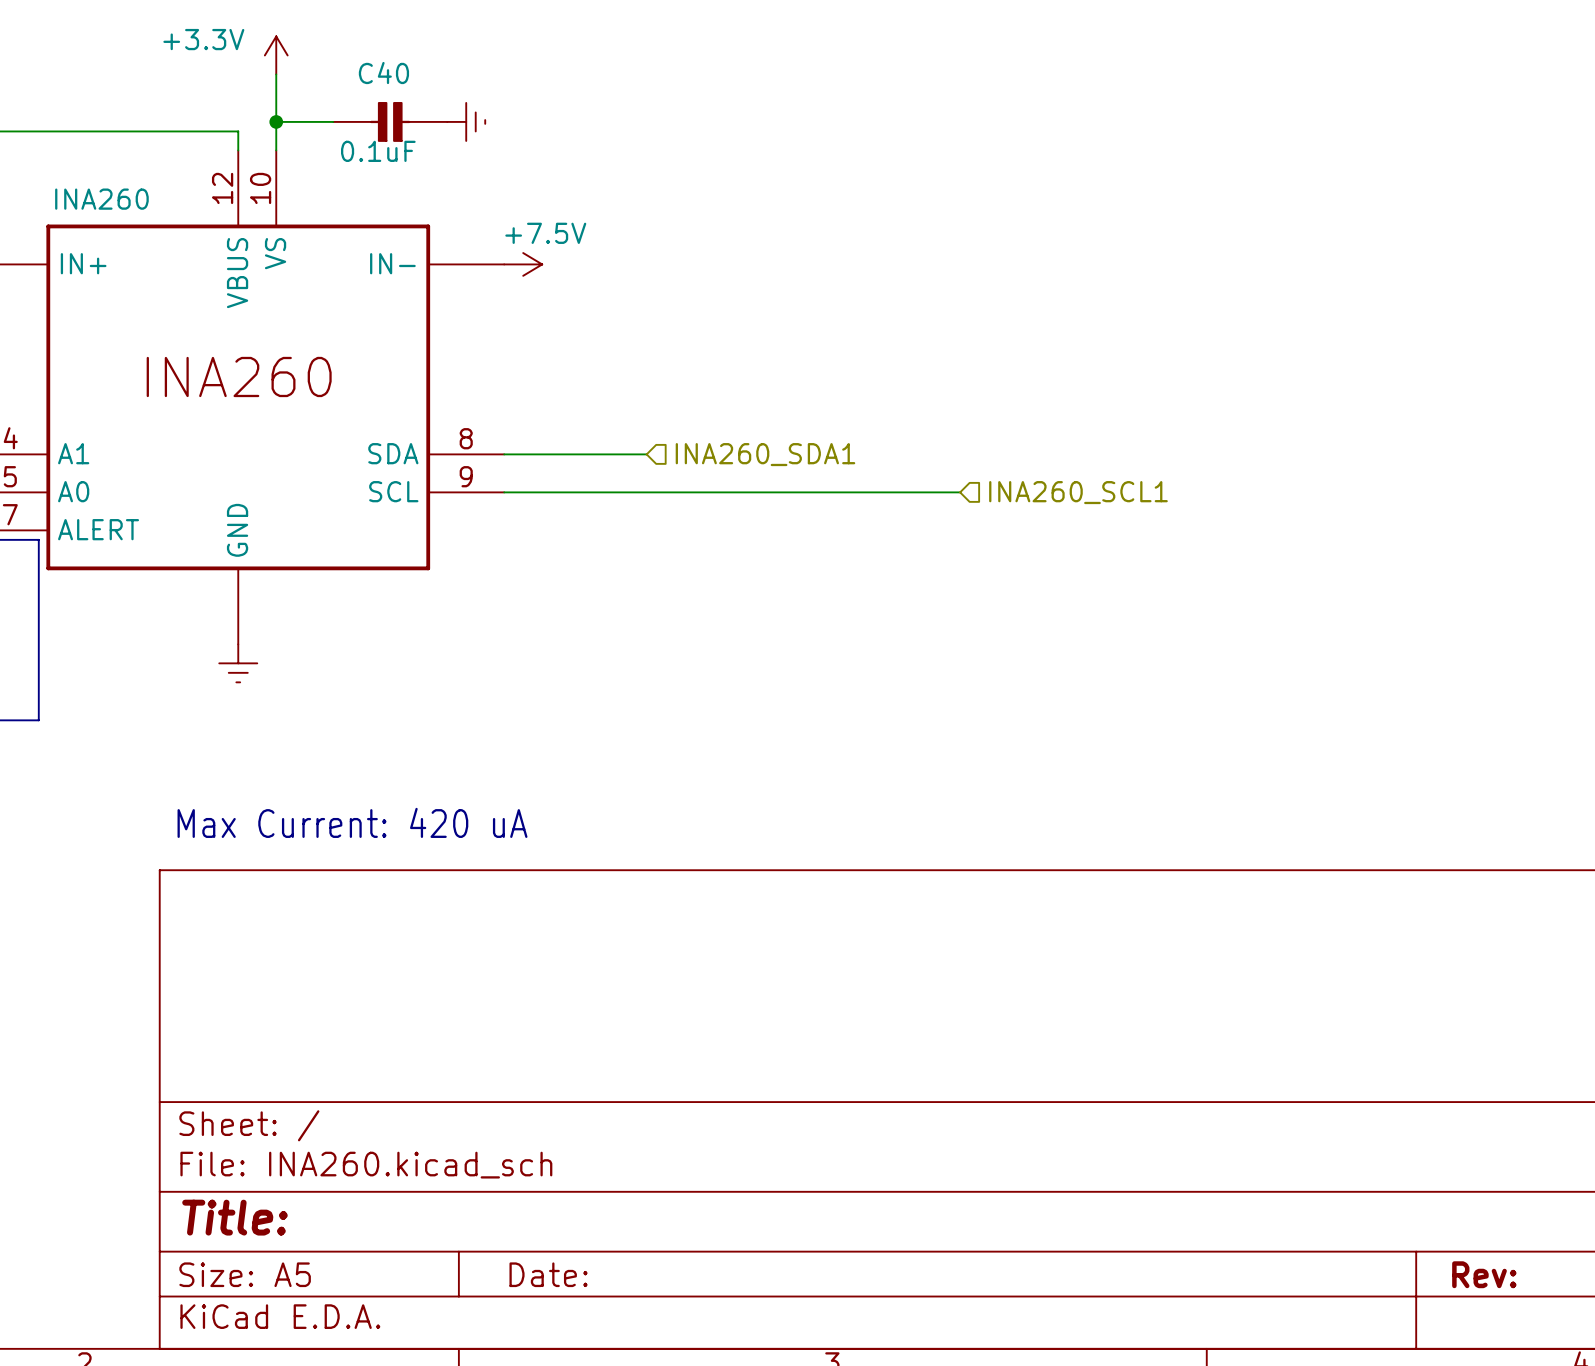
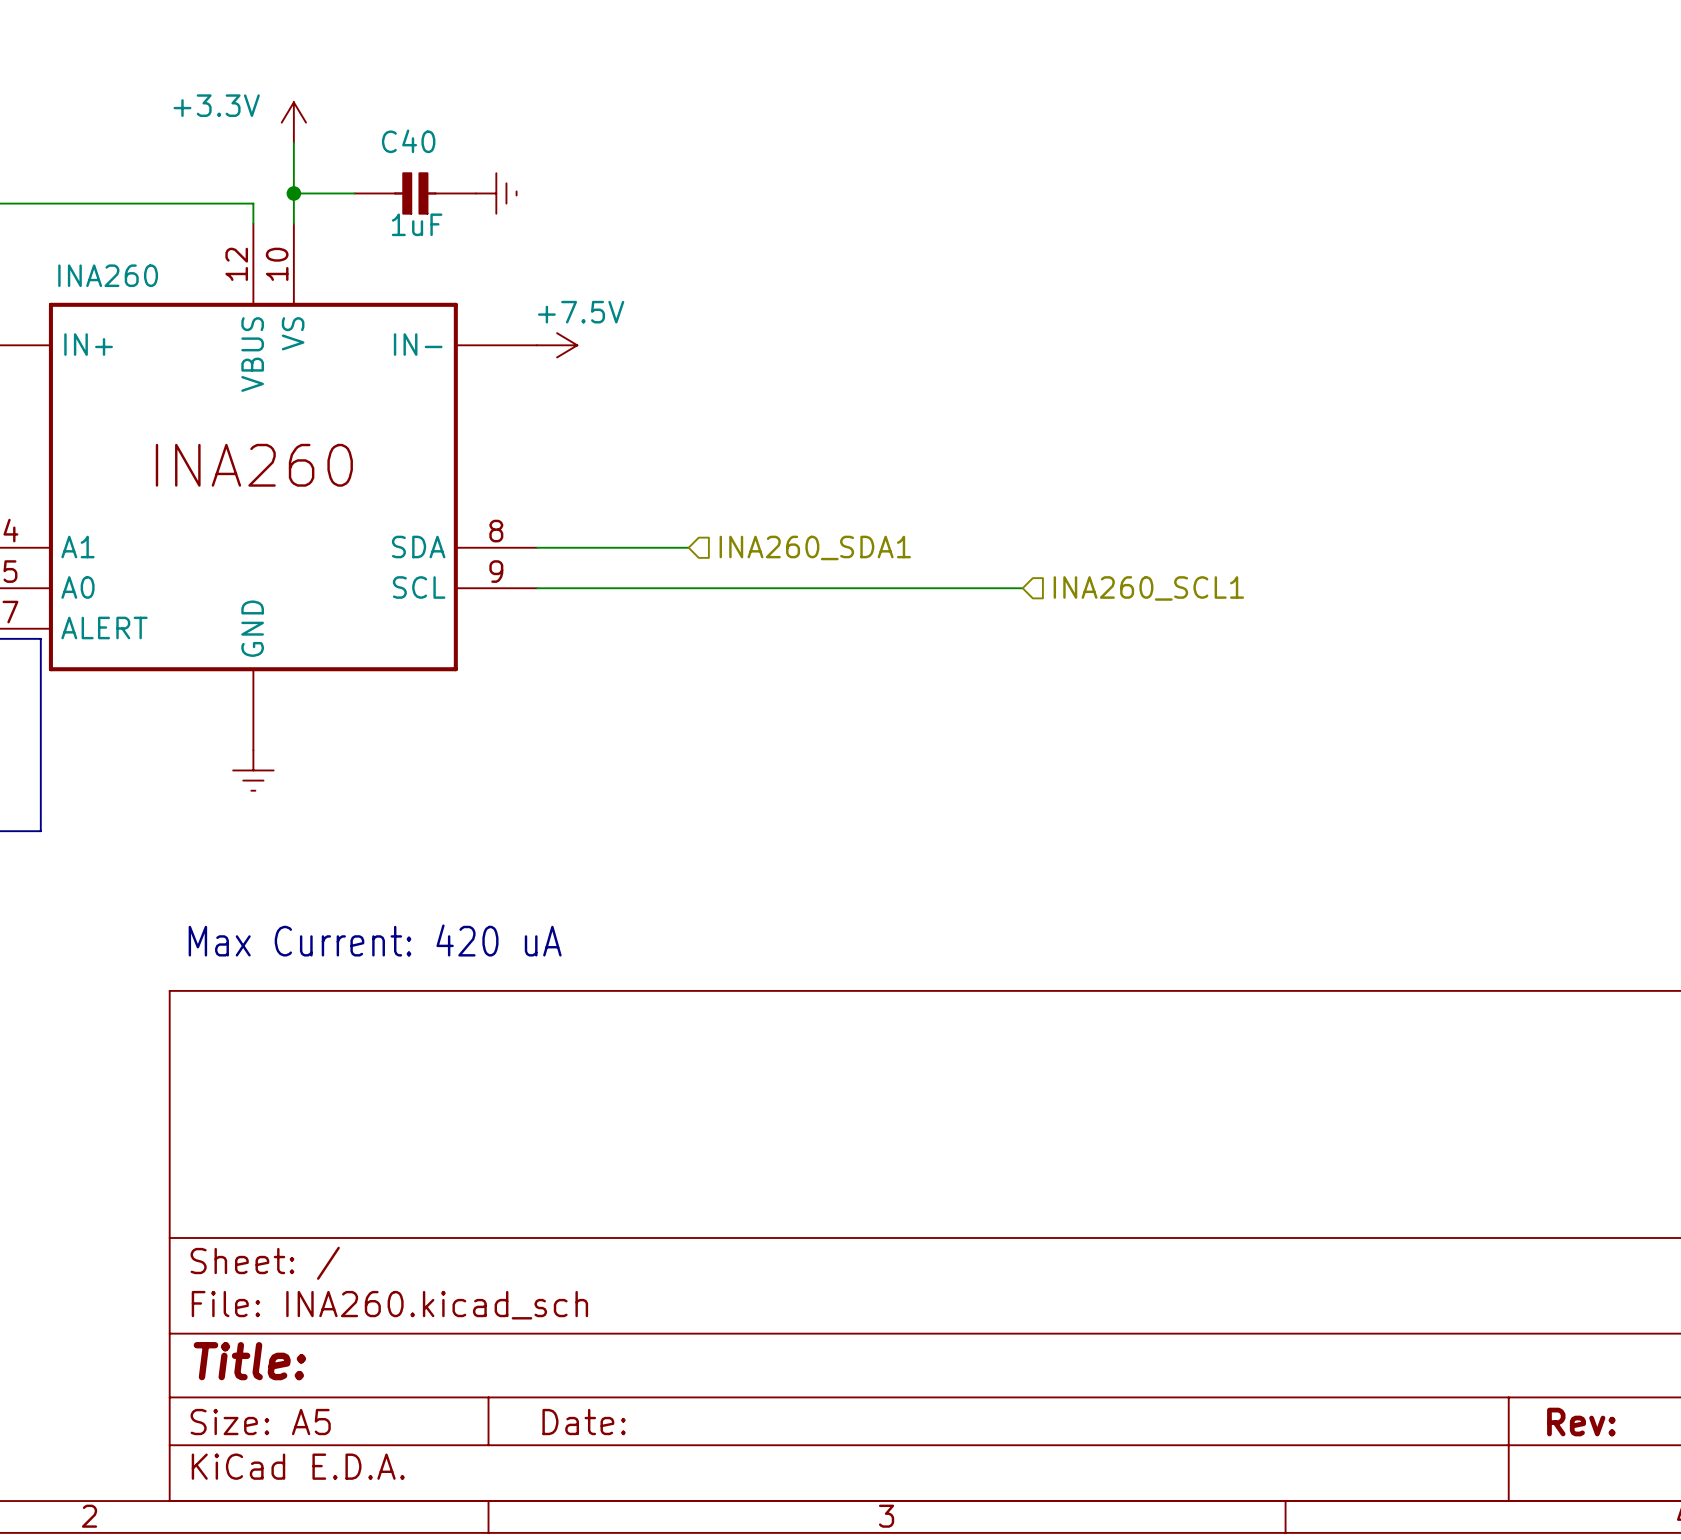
C40 value: 0.1uF (378, 151) -> 1uF (417, 224)

